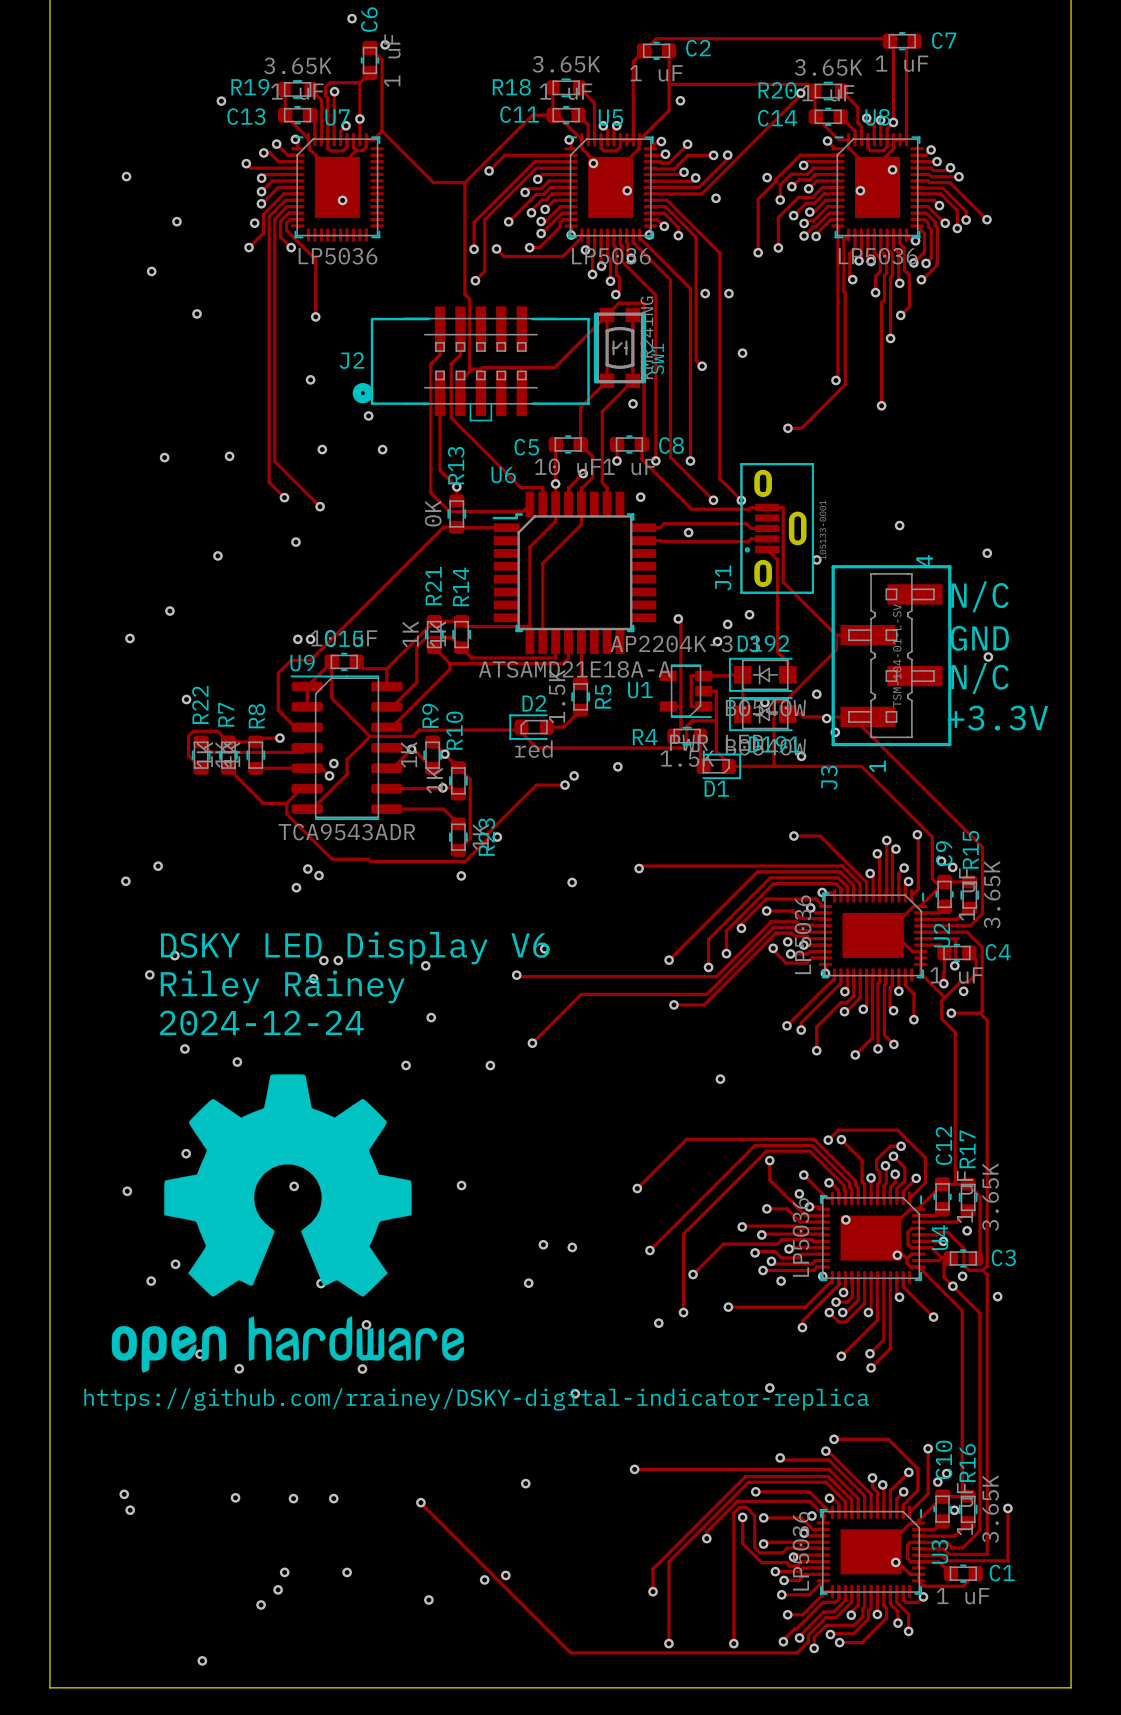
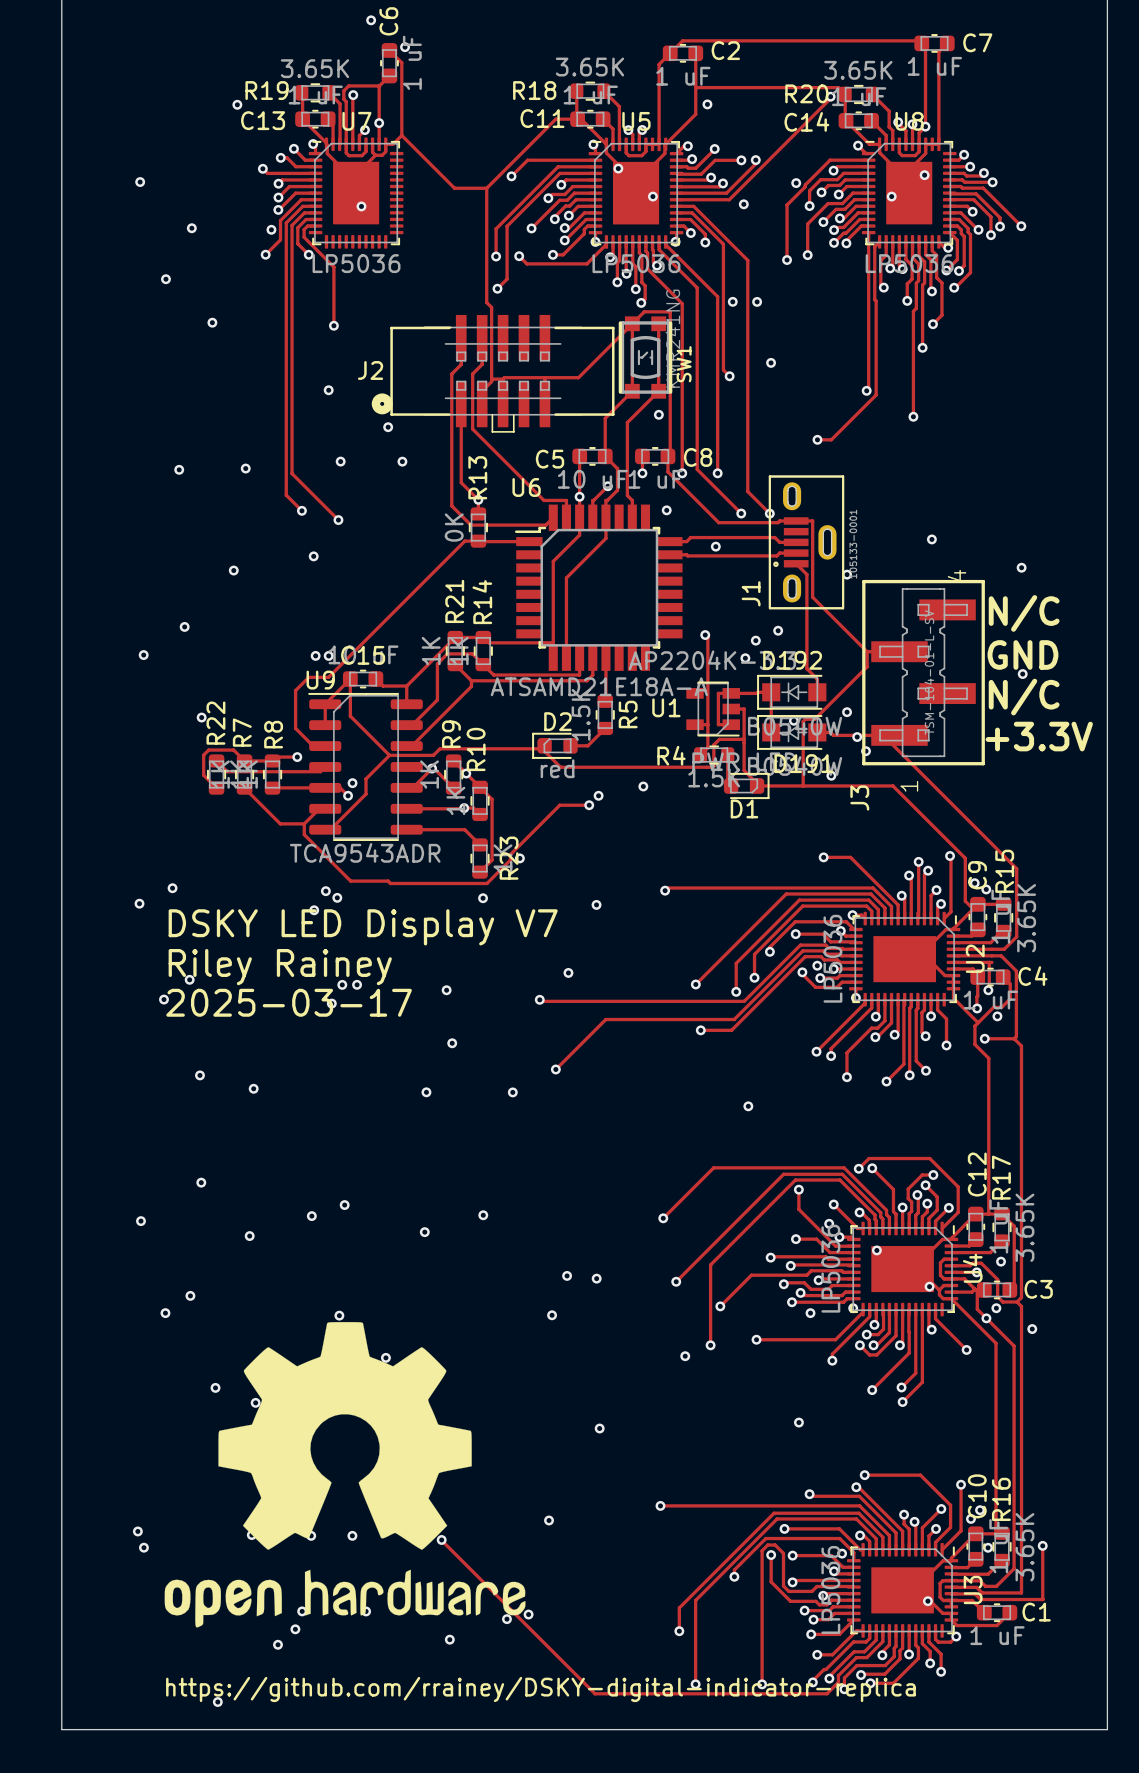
text: DSKY LED Display V6 (355, 947) -> DSKY LED Display V7 (363, 927)
text: none -> 2025-03-17 (289, 1002)
text position: Riley Rainey (282, 986) -> Riley Rainey (280, 967)
text: 2024-12-24 (261, 1023) -> none
drawing position: (287, 1223) -> (345, 1474)
text position: https://github.com/rrainey/DSKY-digital-indicator-replica (476, 1399) -> https://github.com/rrainey/DSKY-digital-indicator-replica (540, 1689)

